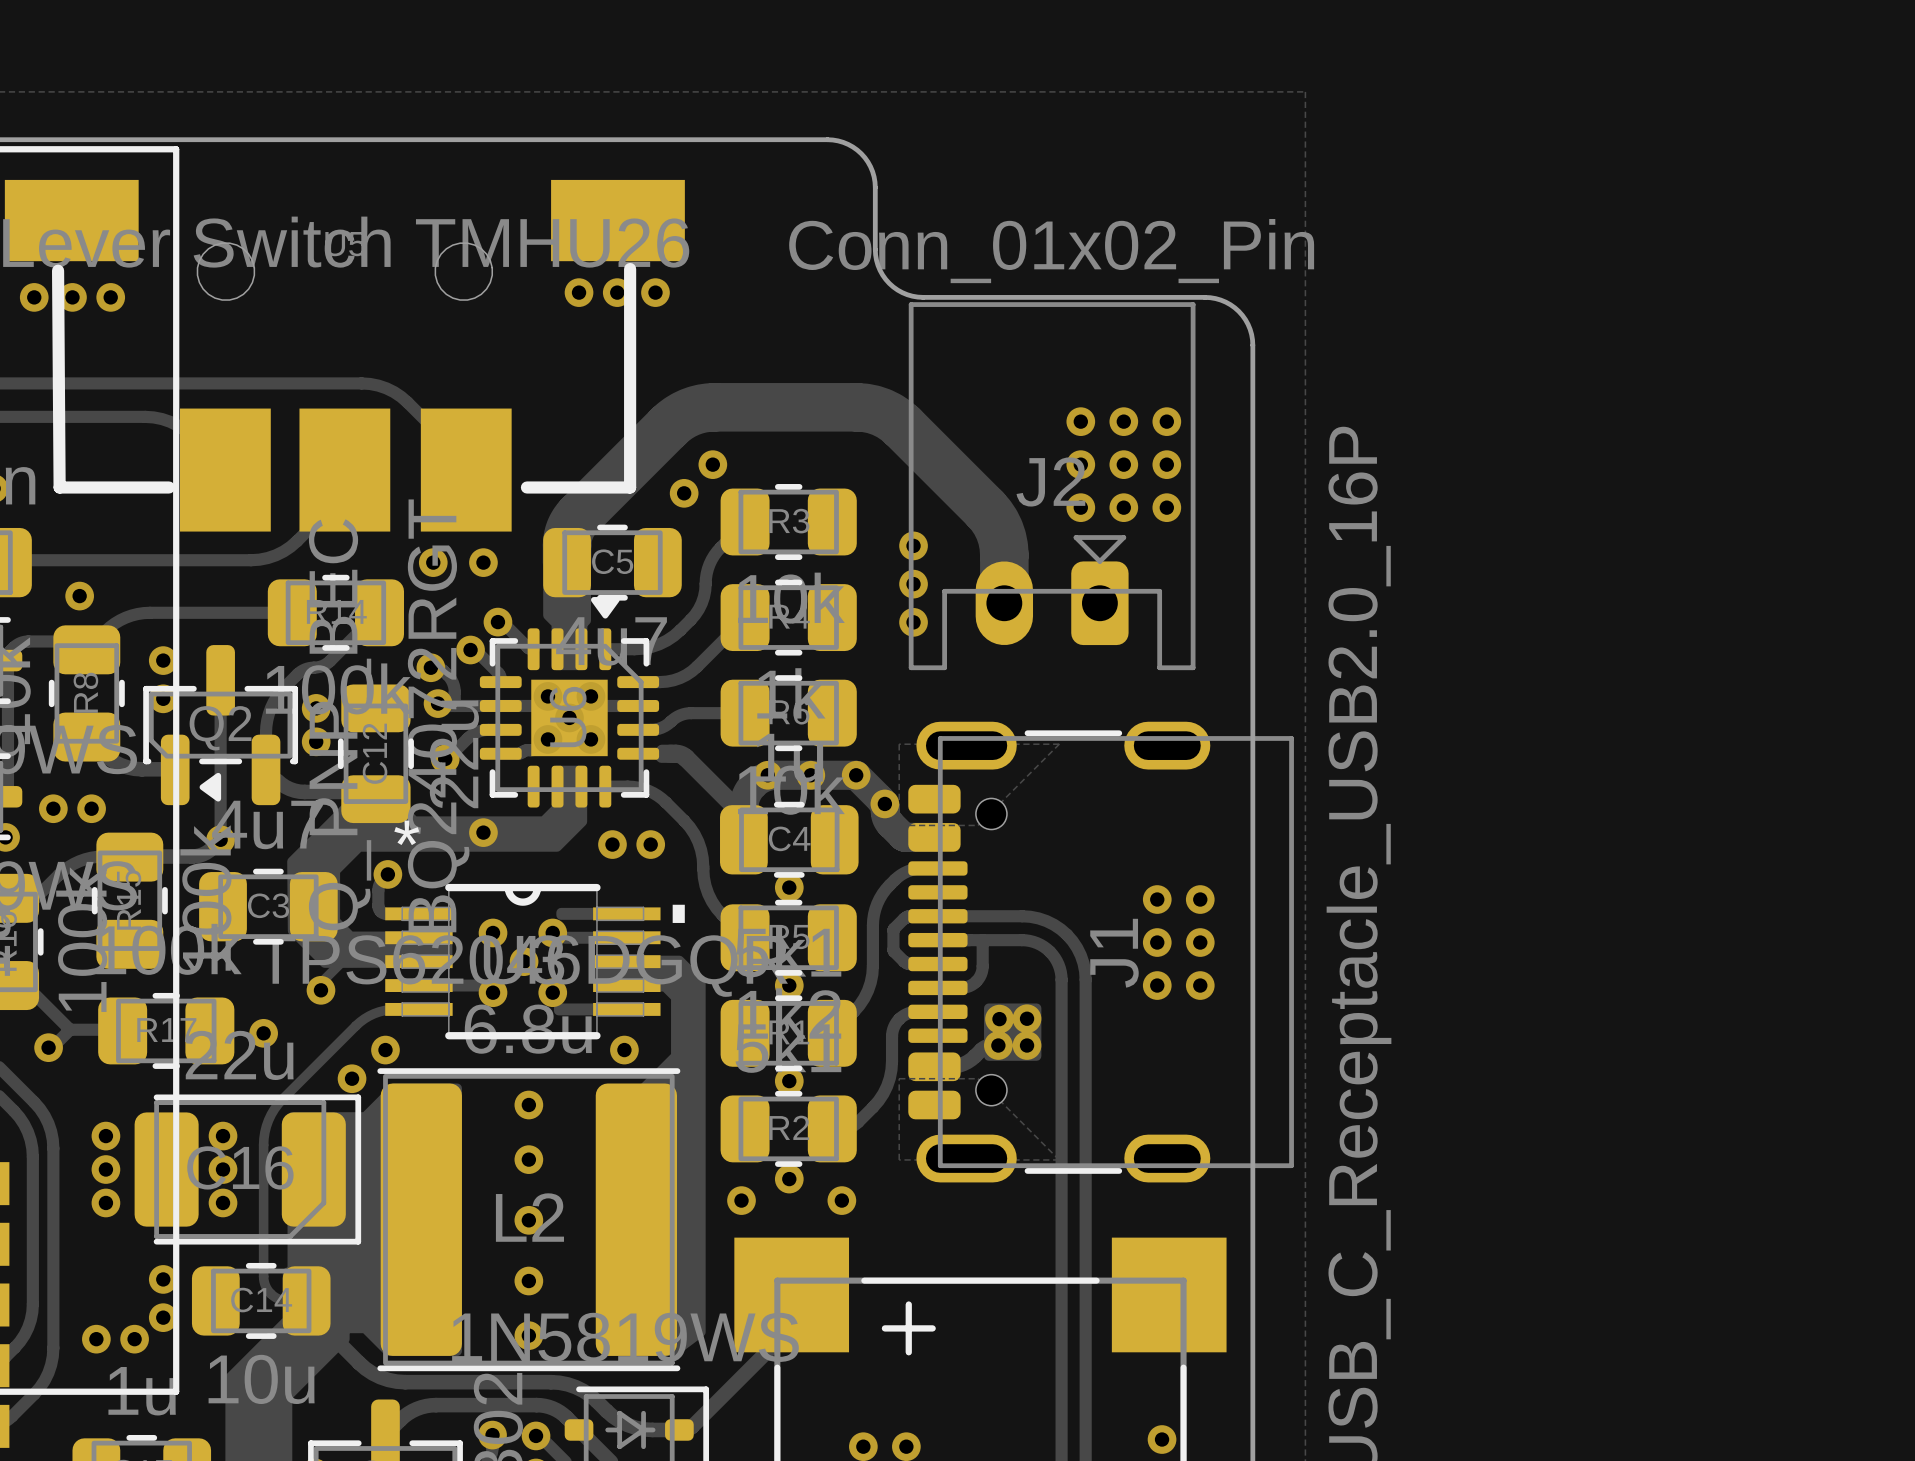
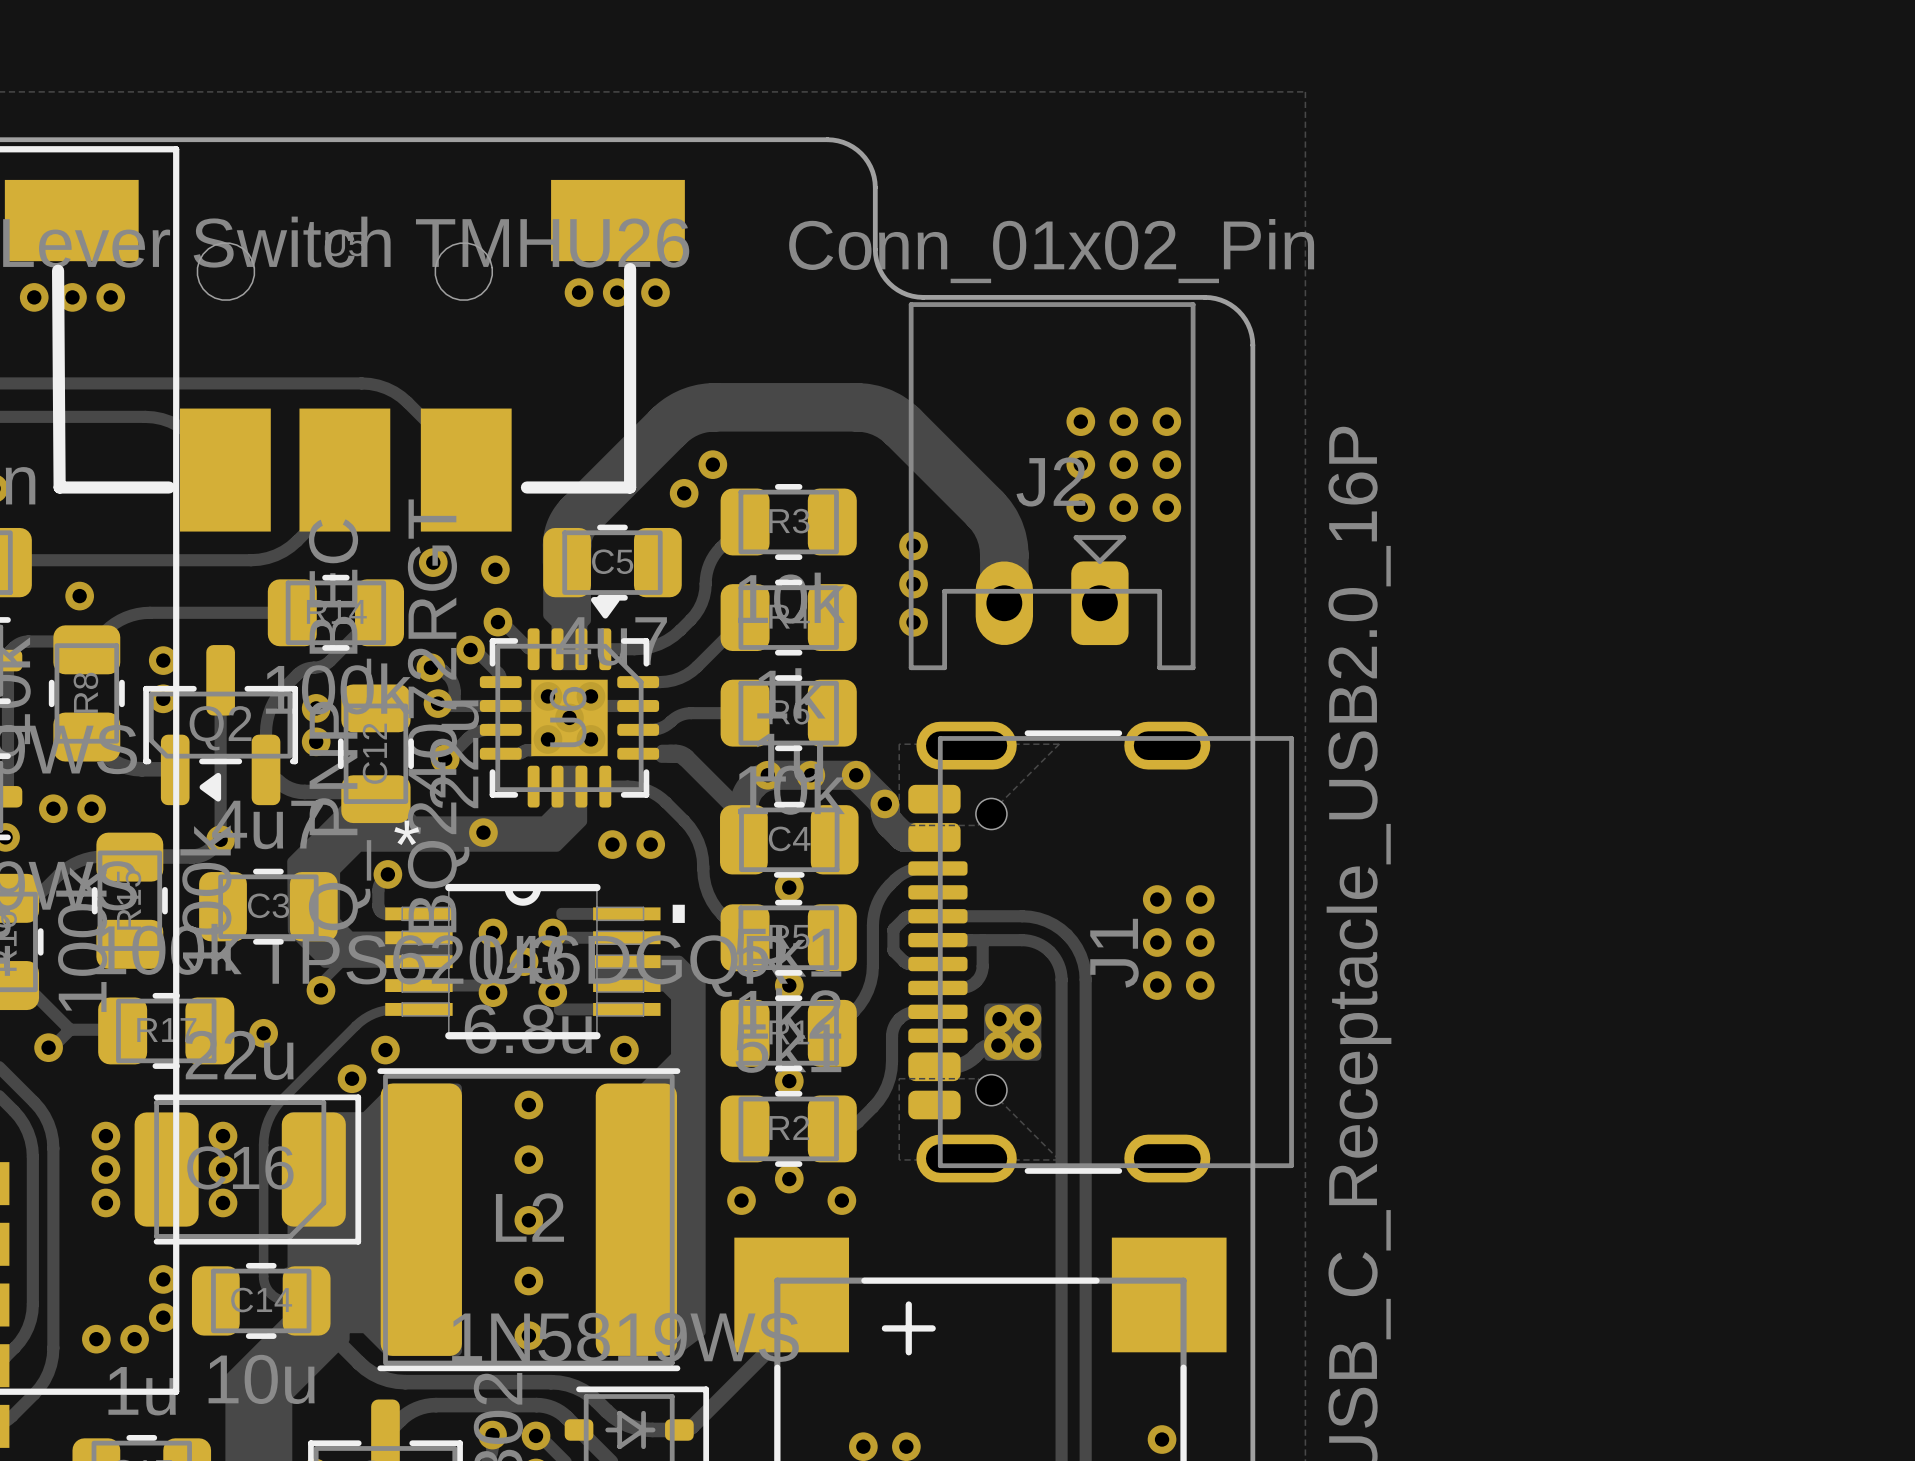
via position: (483, 562) -> (495, 569)

